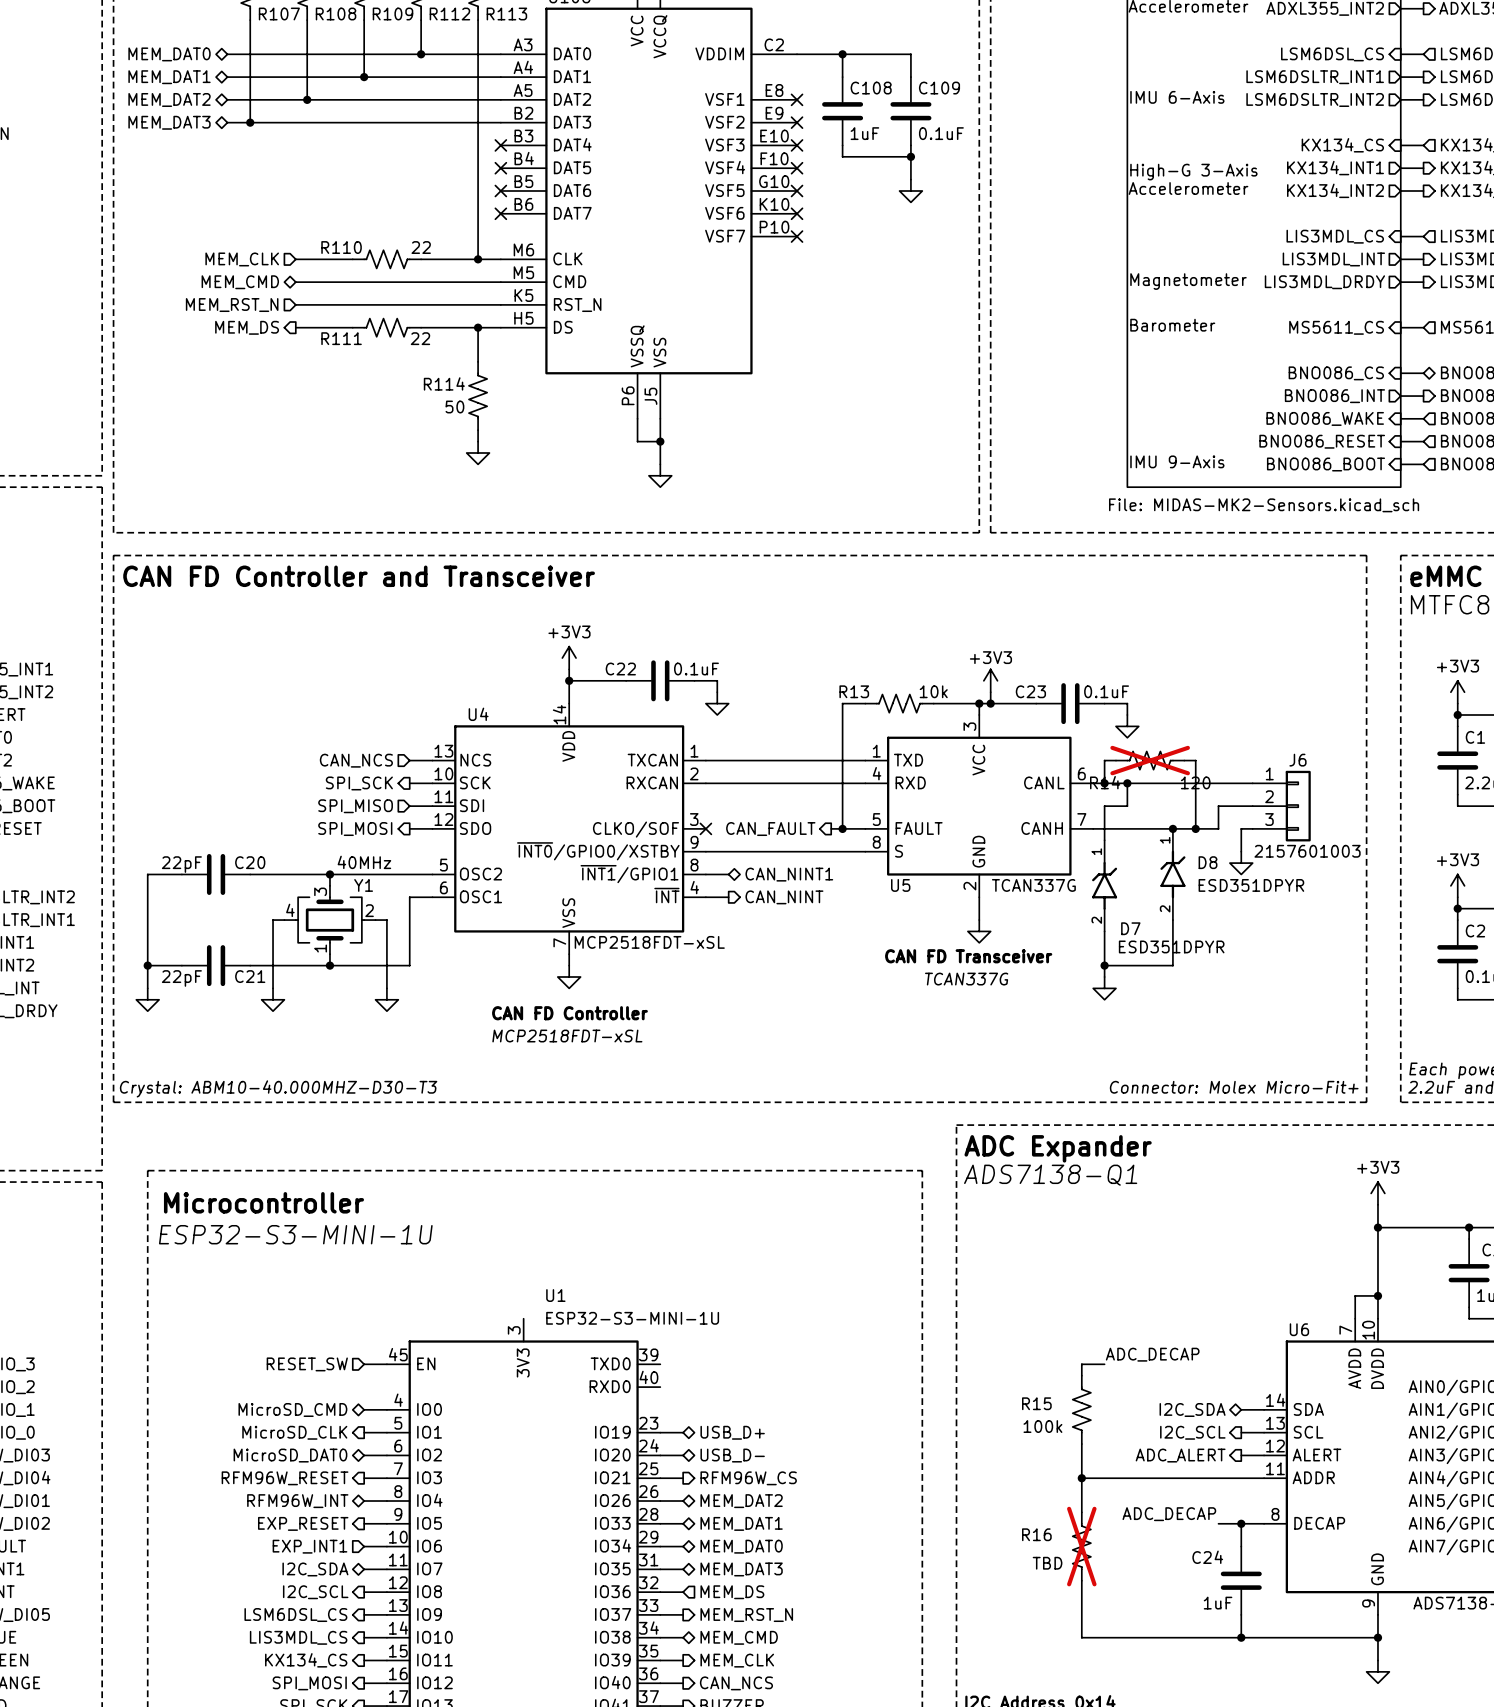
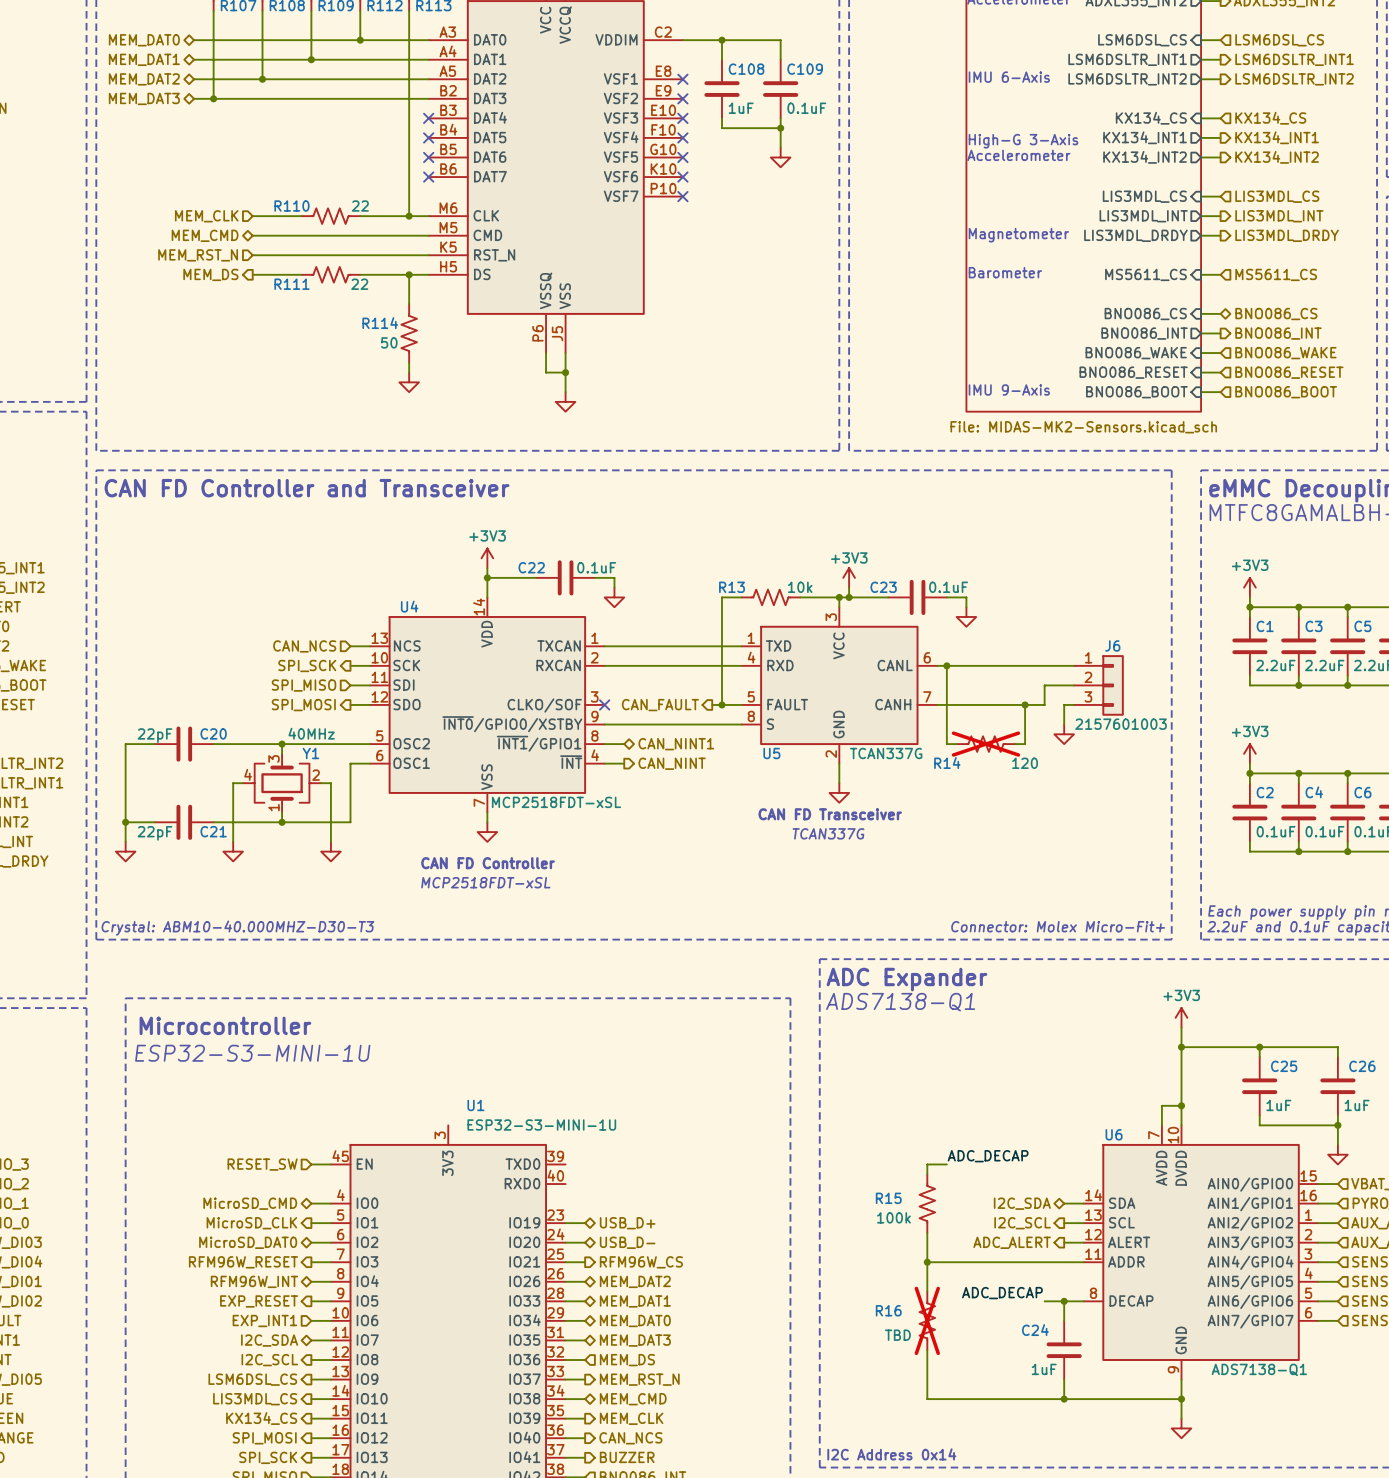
wire: (1115, 760) (1104, 760) (1104, 783) -> none
R14 position: (1150, 760) -> (985, 744)
wire: (1184, 760) (1195, 760) (1195, 828) -> (1015, 744) (1025, 744) (1025, 704)
wire: (1127, 783) (1127, 806) (1104, 806) -> (946, 665) (946, 685)
junction: (1127, 783) -> none
junction: (1172, 828) -> none
D8: ESD351DPYR (1172, 874) -> none
D7: ESD351DPYR (1104, 885) -> none
wire: (1172, 920) (1172, 965) (1104, 965) -> none
wire: (1104, 931) (1104, 977) -> none
junction: (1104, 965) -> none
power symbol: (1104, 988) -> none

